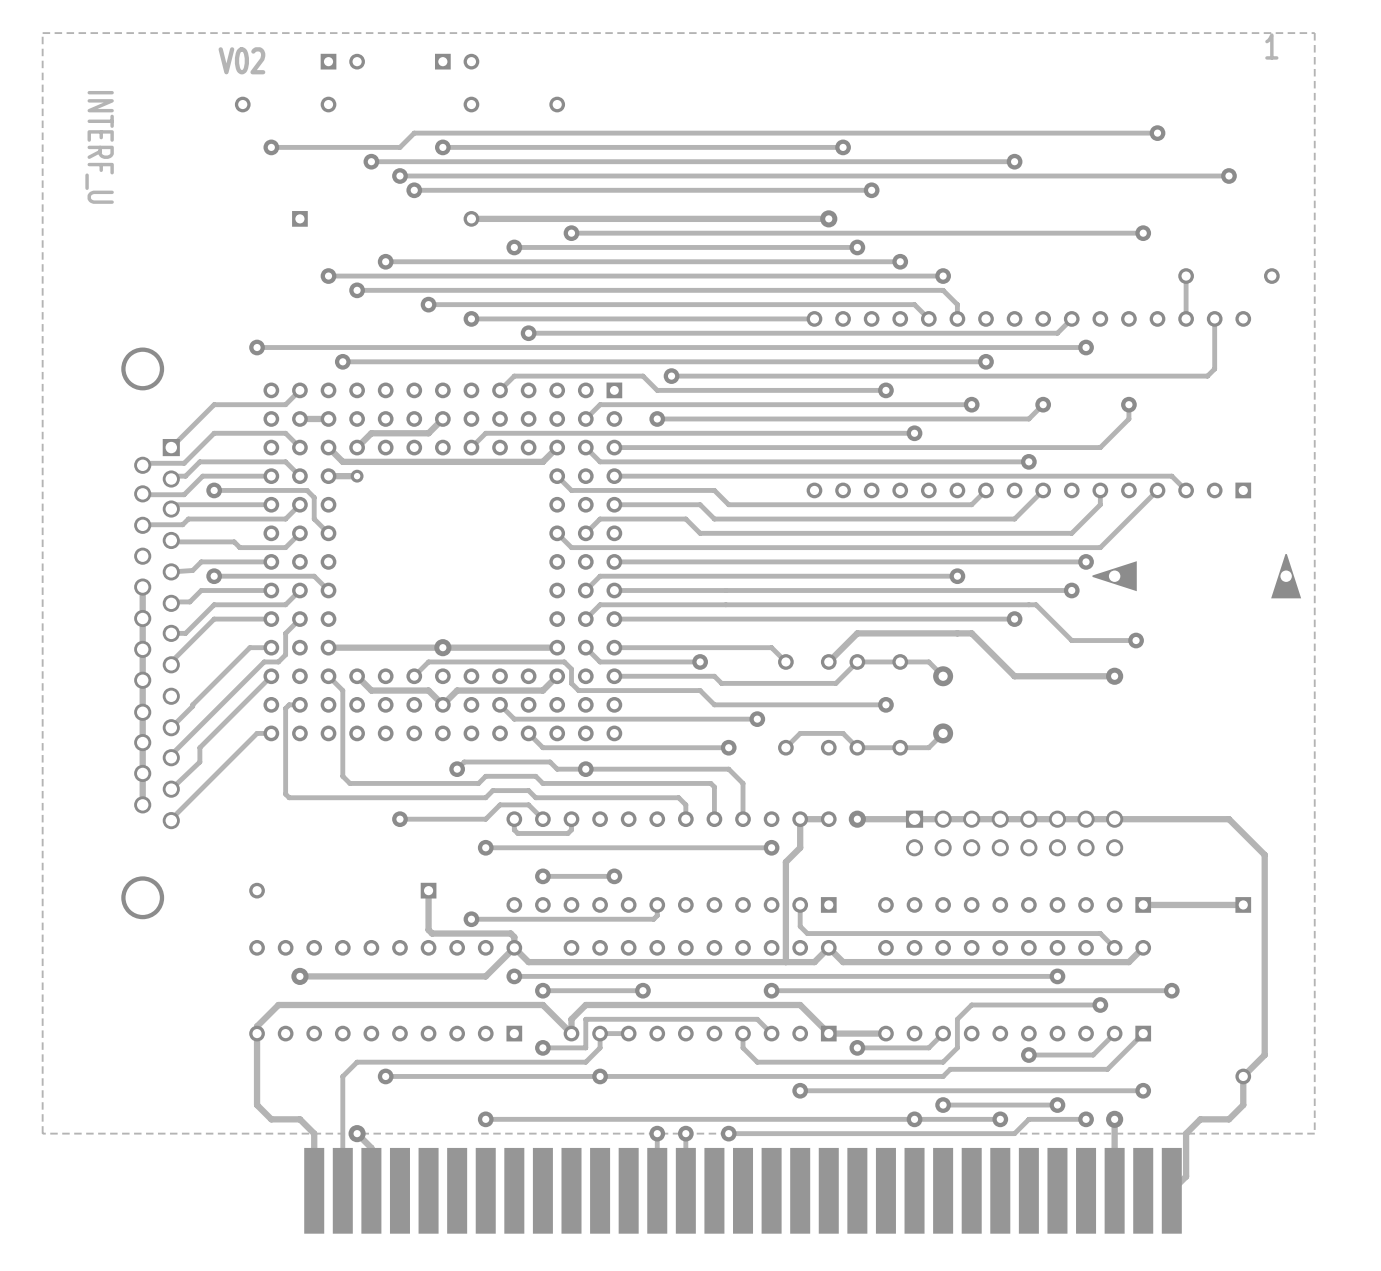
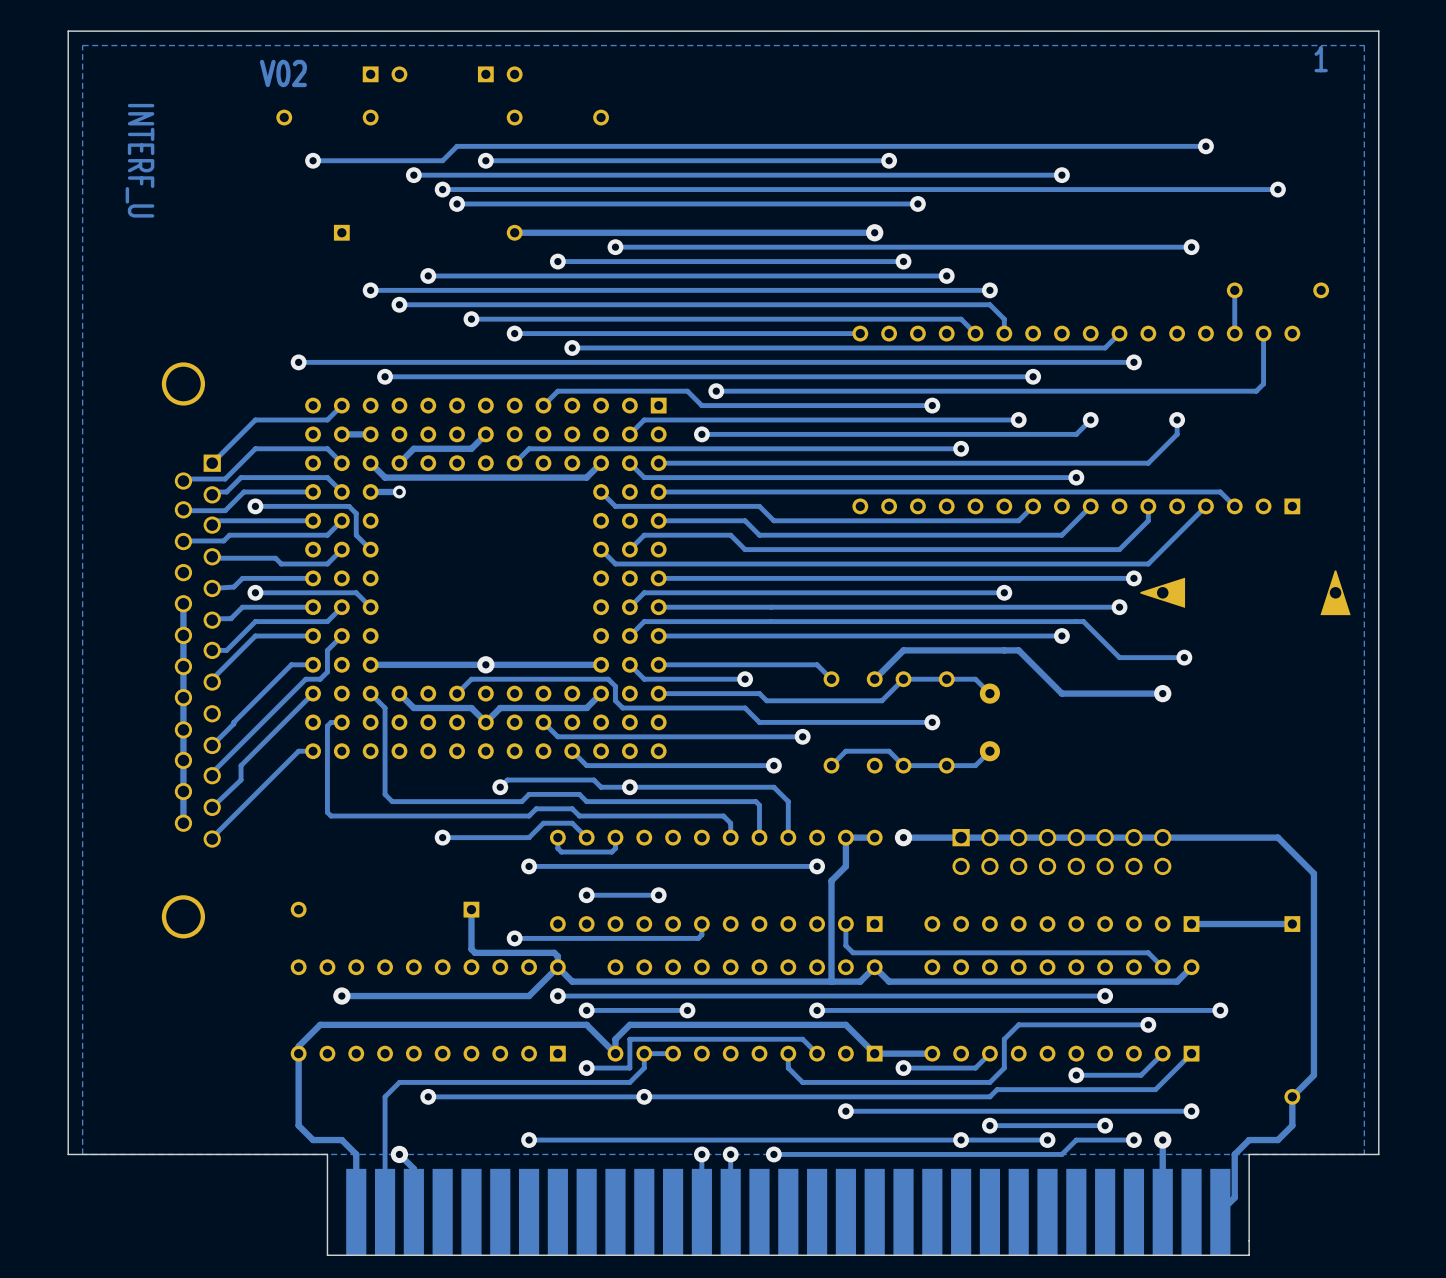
board edge: none -> (1378, 31) (1378, 1154) (1249, 1154) (1249, 1255) (327, 1255) (327, 1154) (68, 1154) (68, 31) (1378, 31)

